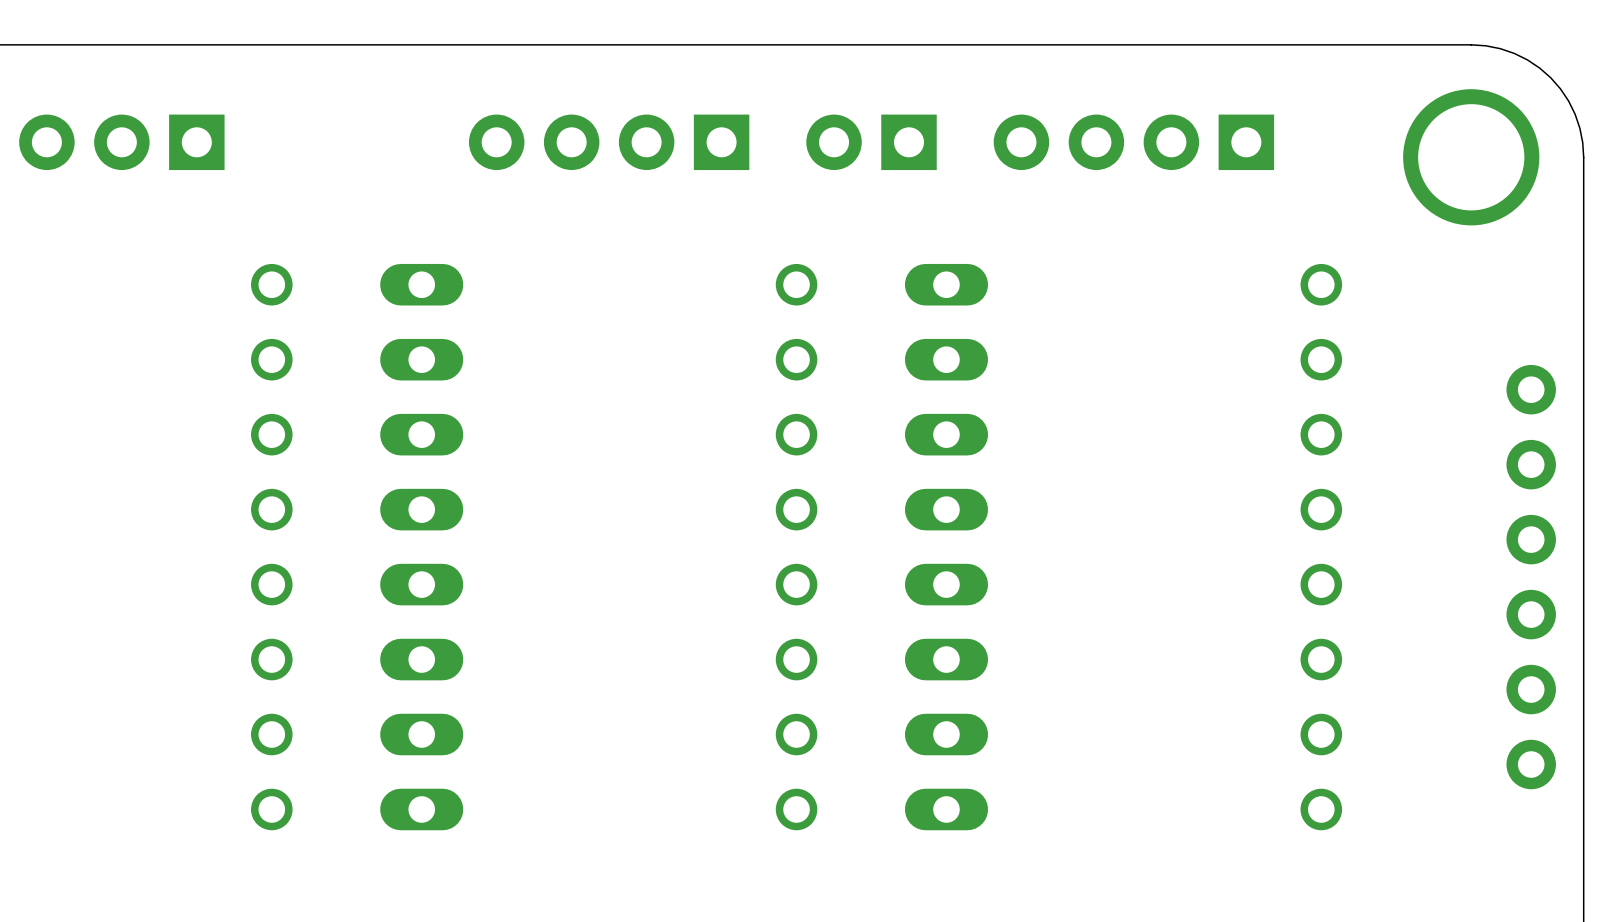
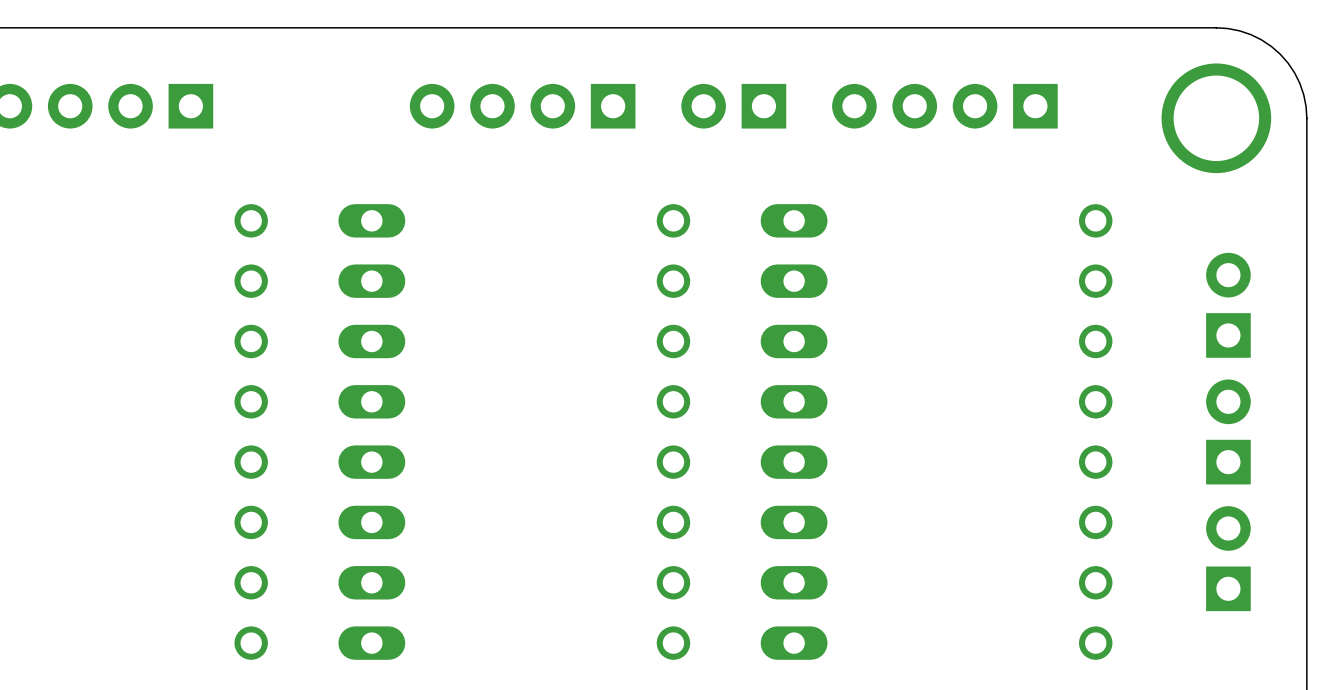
part: none -> (1228, 305)
part: (1531, 427) -> none
part: none -> (1228, 431)
part: (1531, 577) -> none
part: none -> (1228, 558)
part: (1531, 727) -> none

